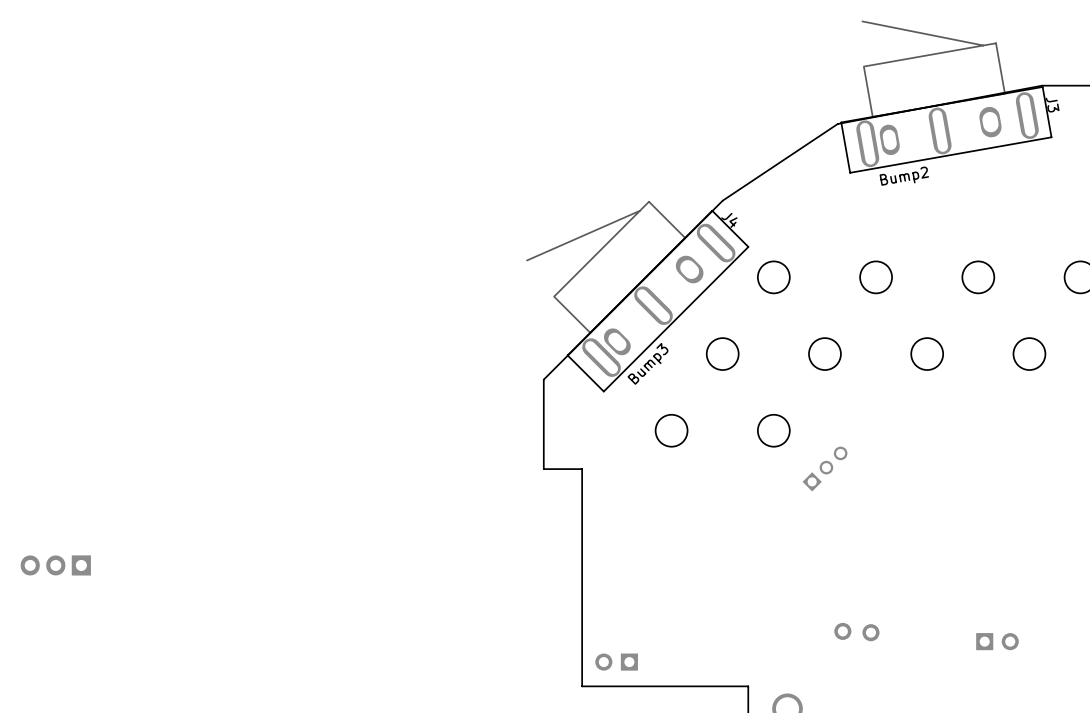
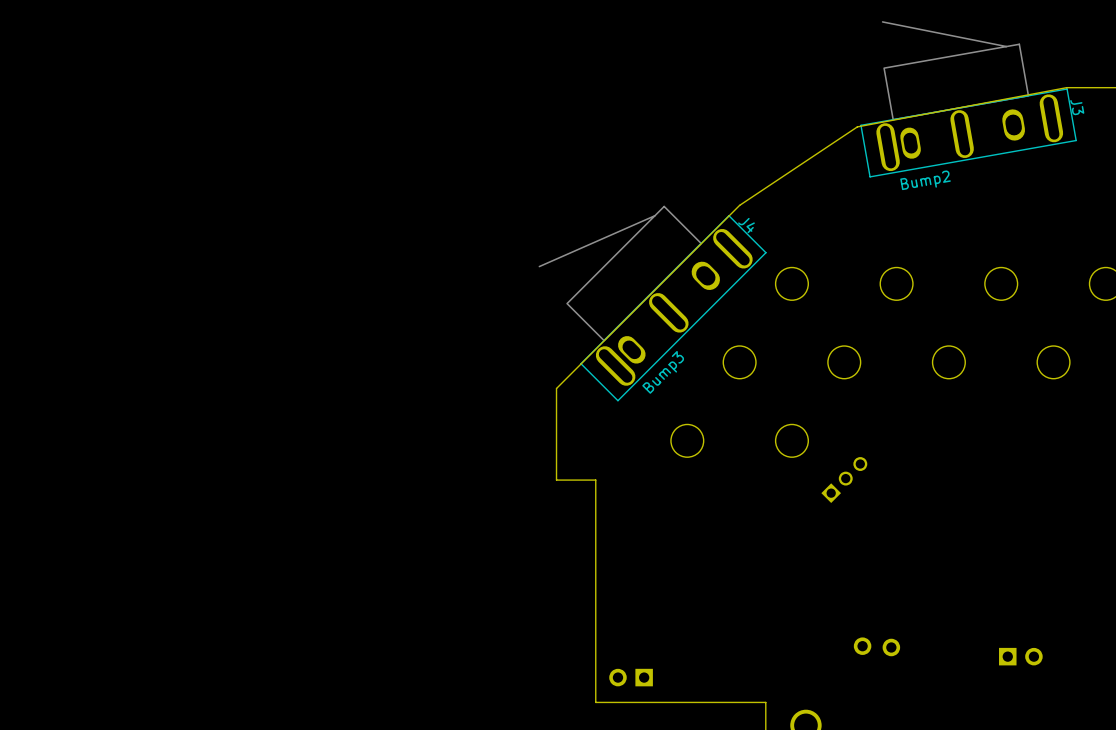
part: (55, 565) -> none

